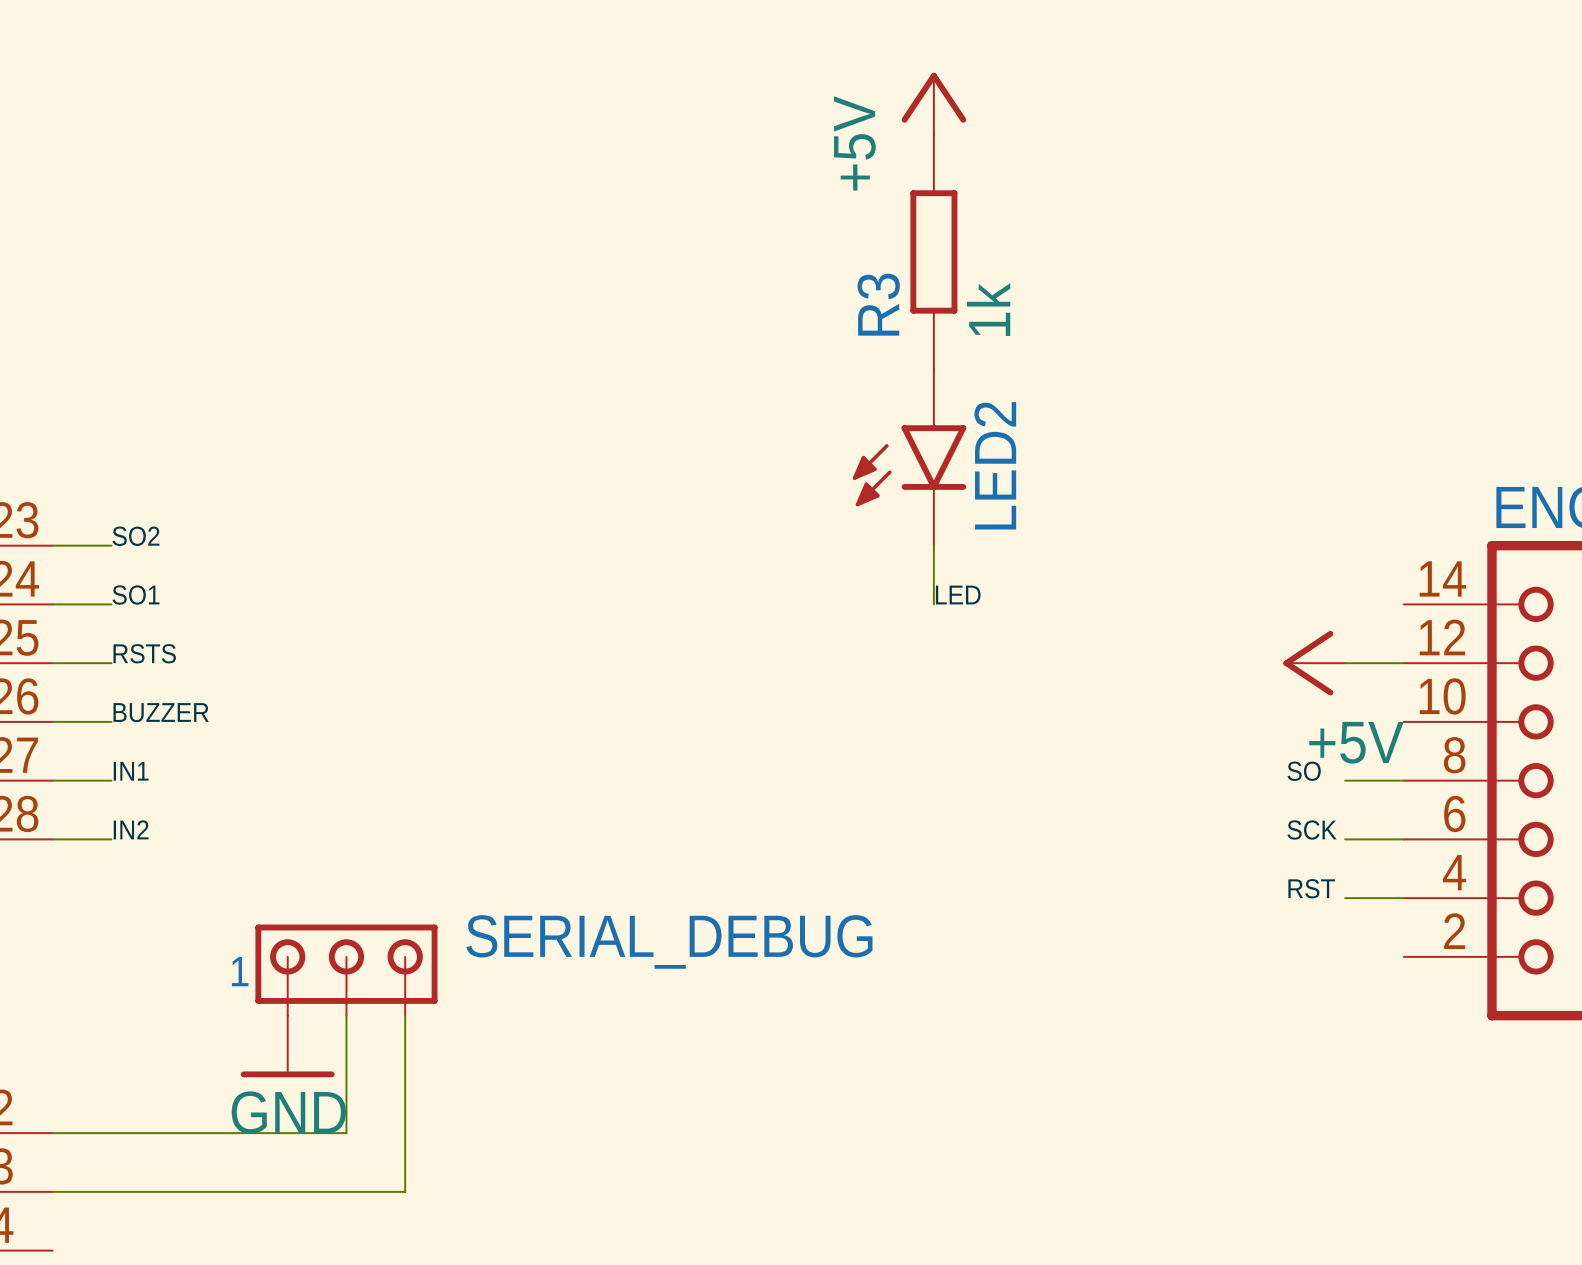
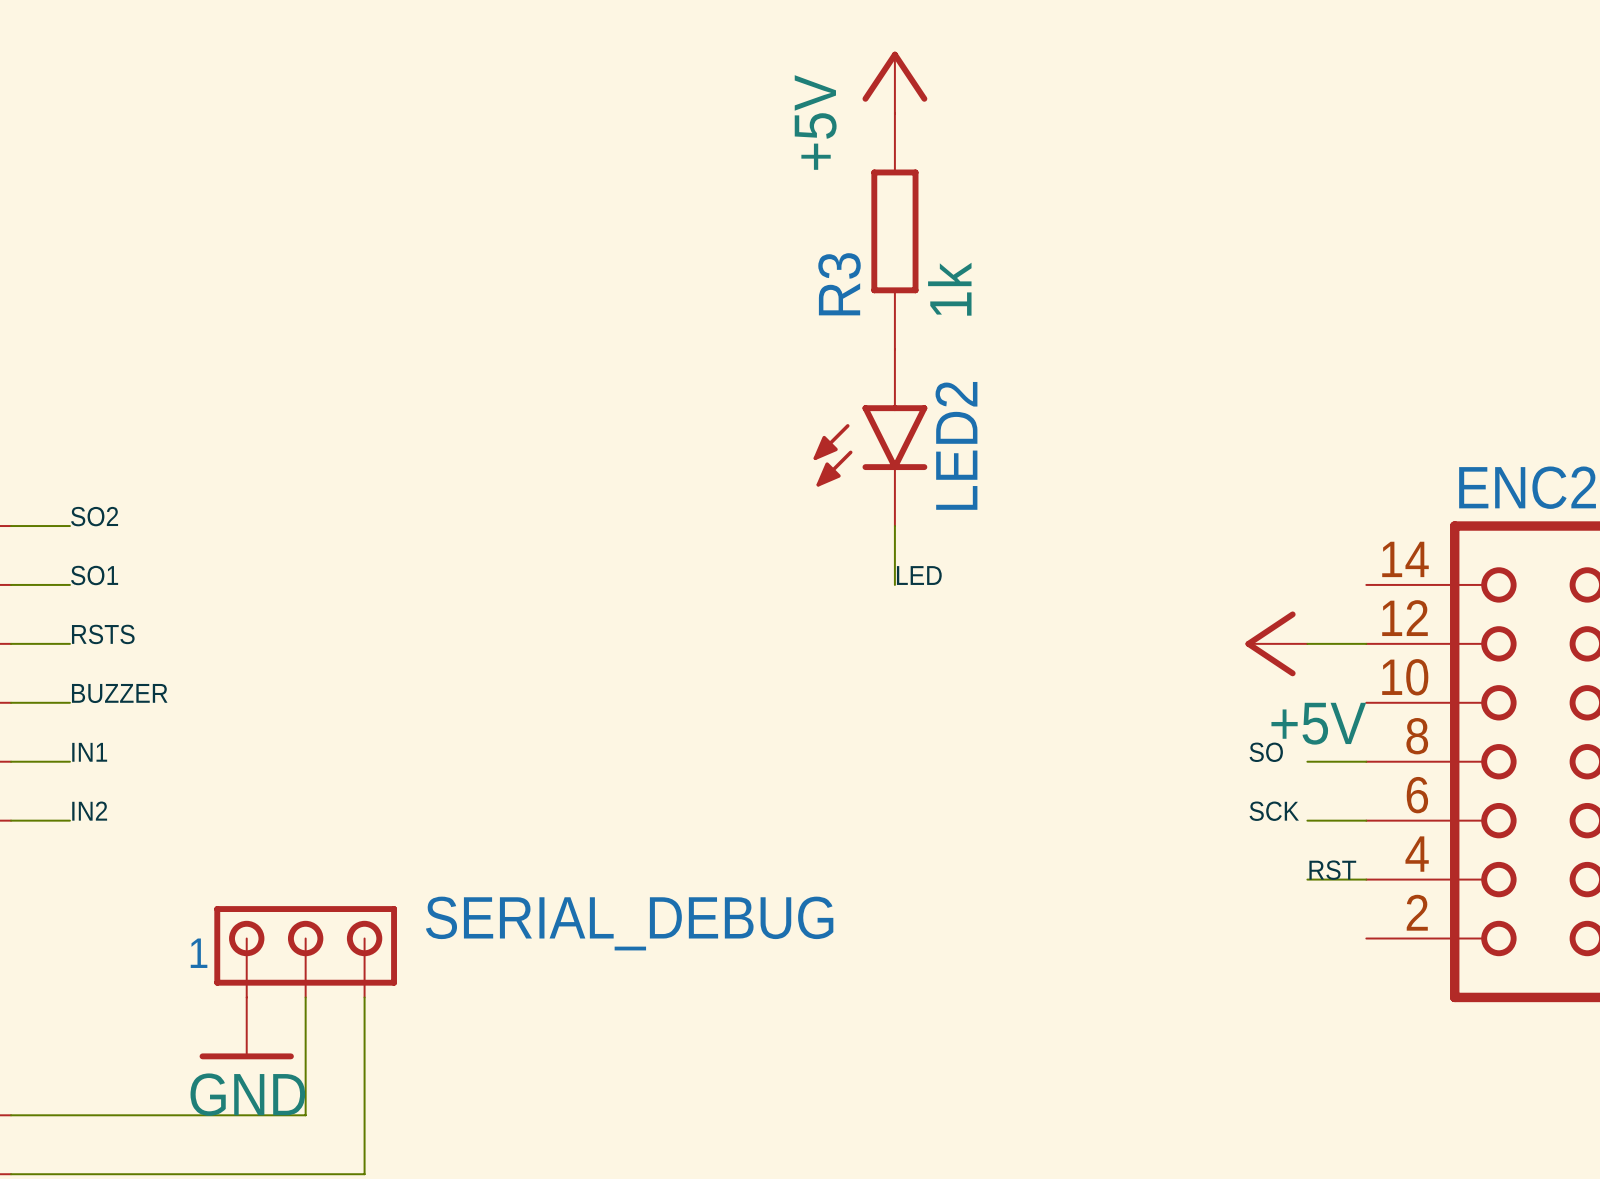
label position: RST (1311, 888) -> RST (1332, 870)

